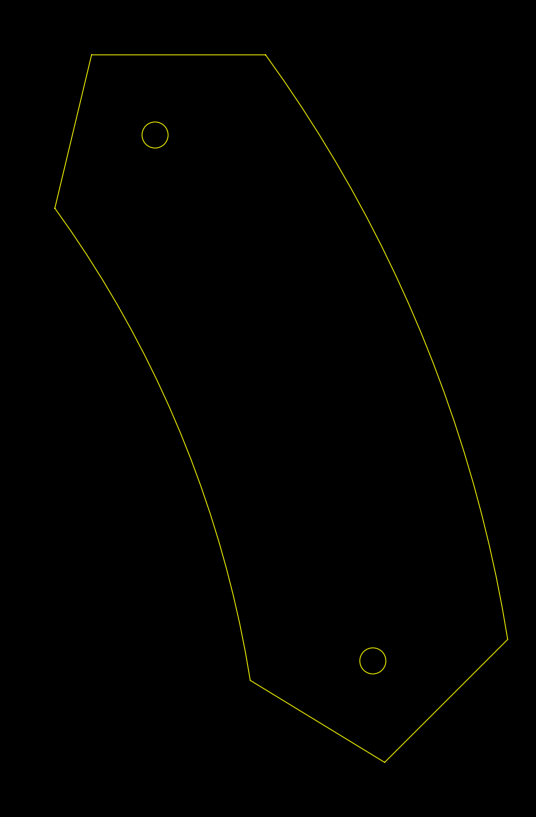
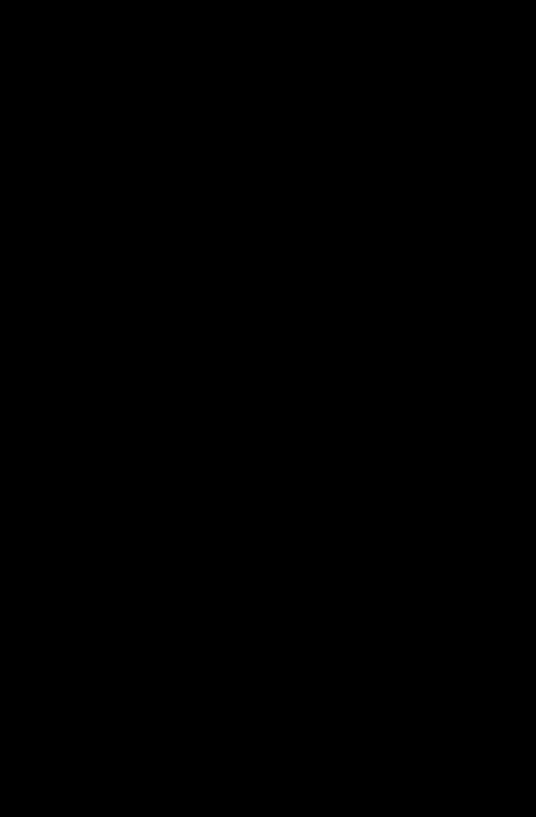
board edge: (91, 54) (54, 208) (117, 304) (144, 354) (180, 432) (210, 513) (226, 568) (250, 680) (384, 762) (507, 639) (496, 576) (473, 483) (454, 422) (421, 332) (381, 245) (351, 189) (319, 134) (265, 54) (91, 54) -> none
round board edge: [141, 121, 169, 149] -> none
round board edge: [359, 647, 387, 675] -> none

